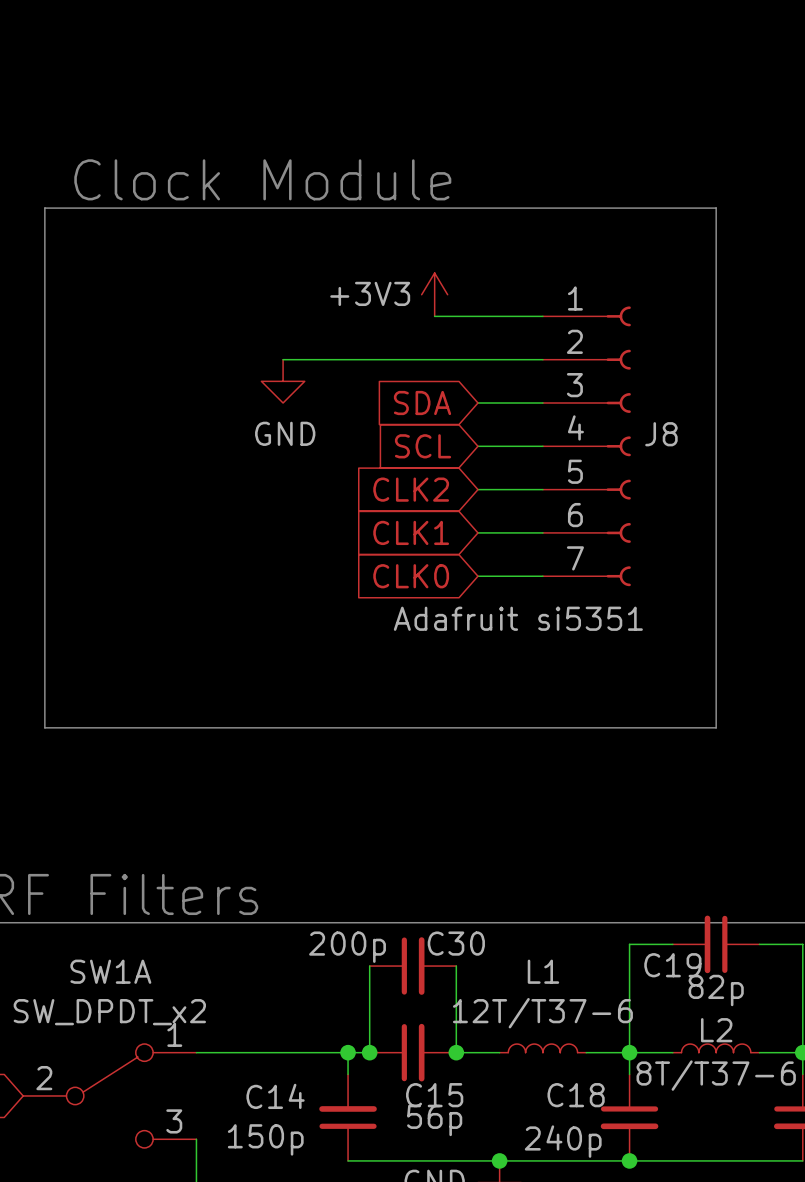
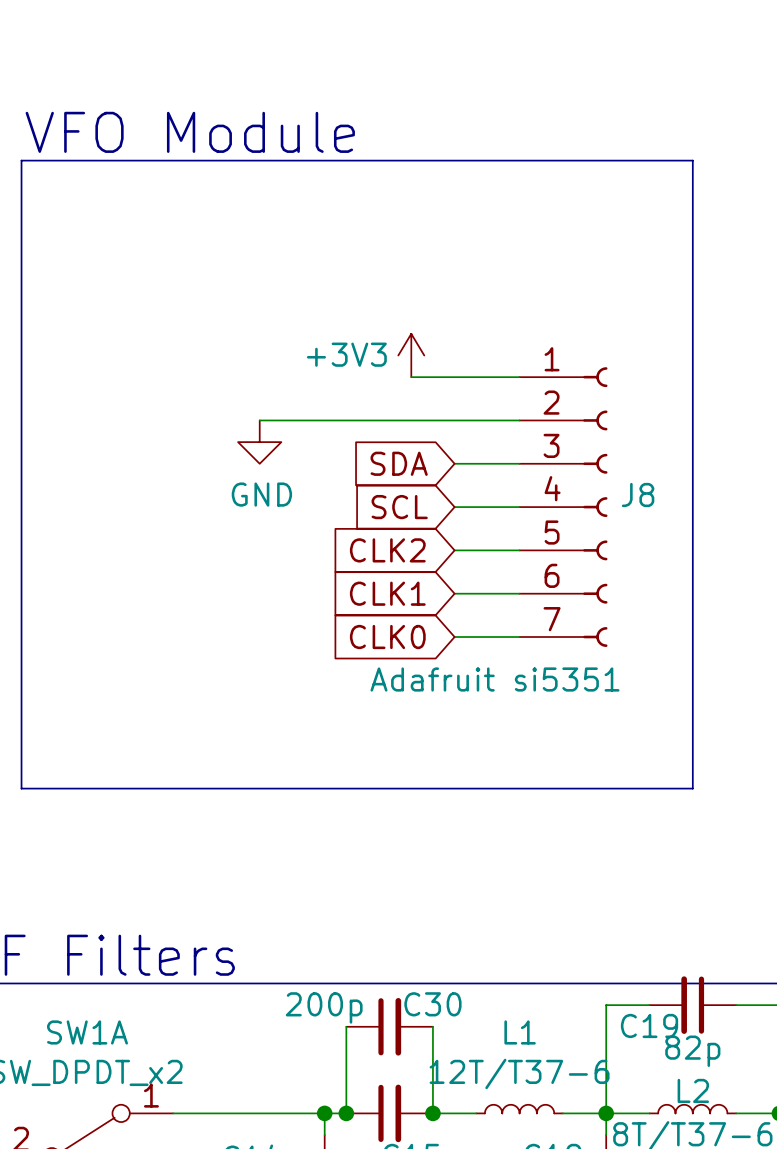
text: none -> VFO Module (190, 132)
text: Clock Module (262, 179) -> none
line: (44, 208) (716, 208) -> (21, 268) (21, 160) (692, 160) (692, 268)

